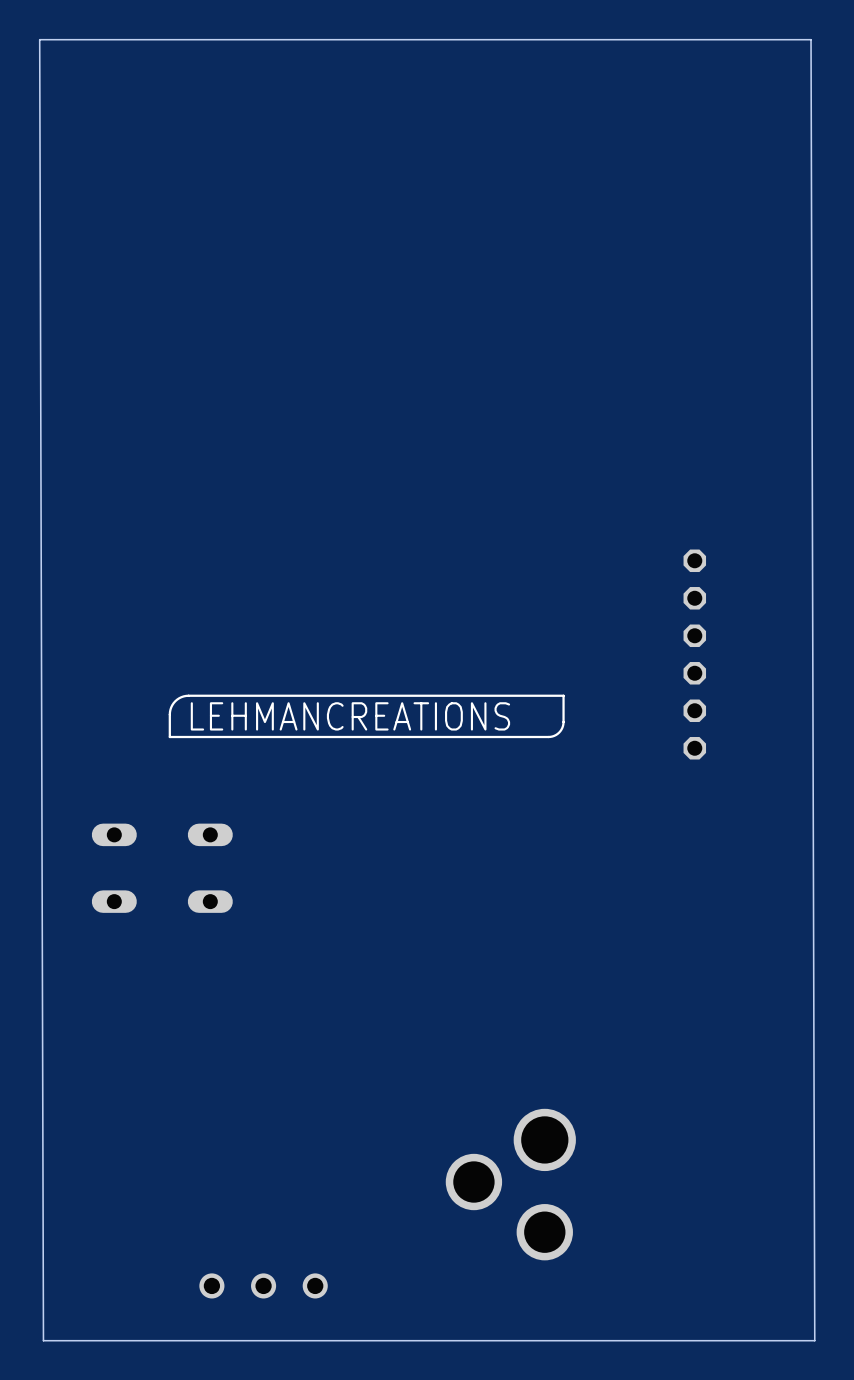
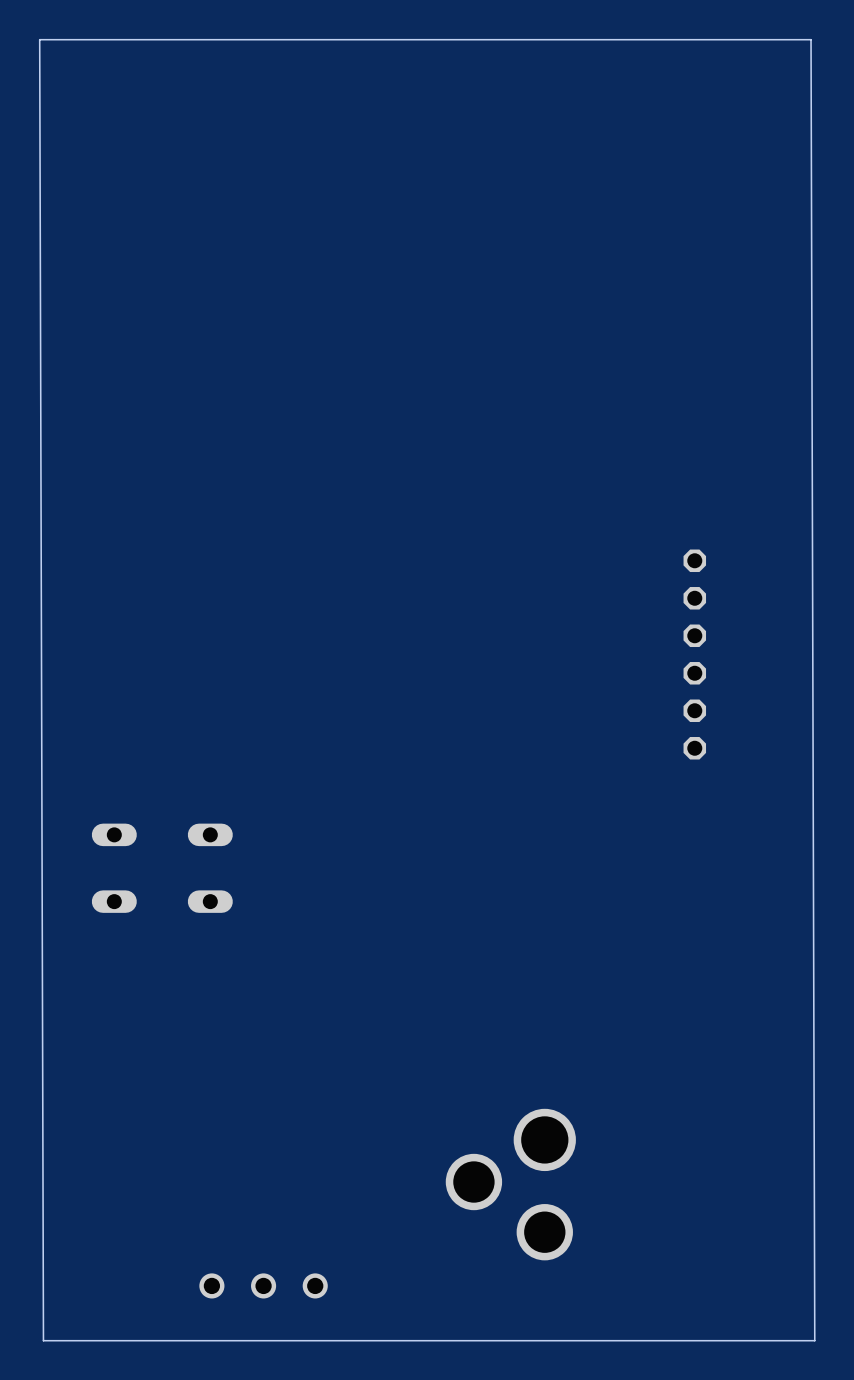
line: (563, 695) (563, 725) (559, 732) (550, 736) (169, 737) (171, 707) (177, 699) (186, 695) (563, 695) -> none
text: LEHMANCREATIONS (350, 716) -> none

